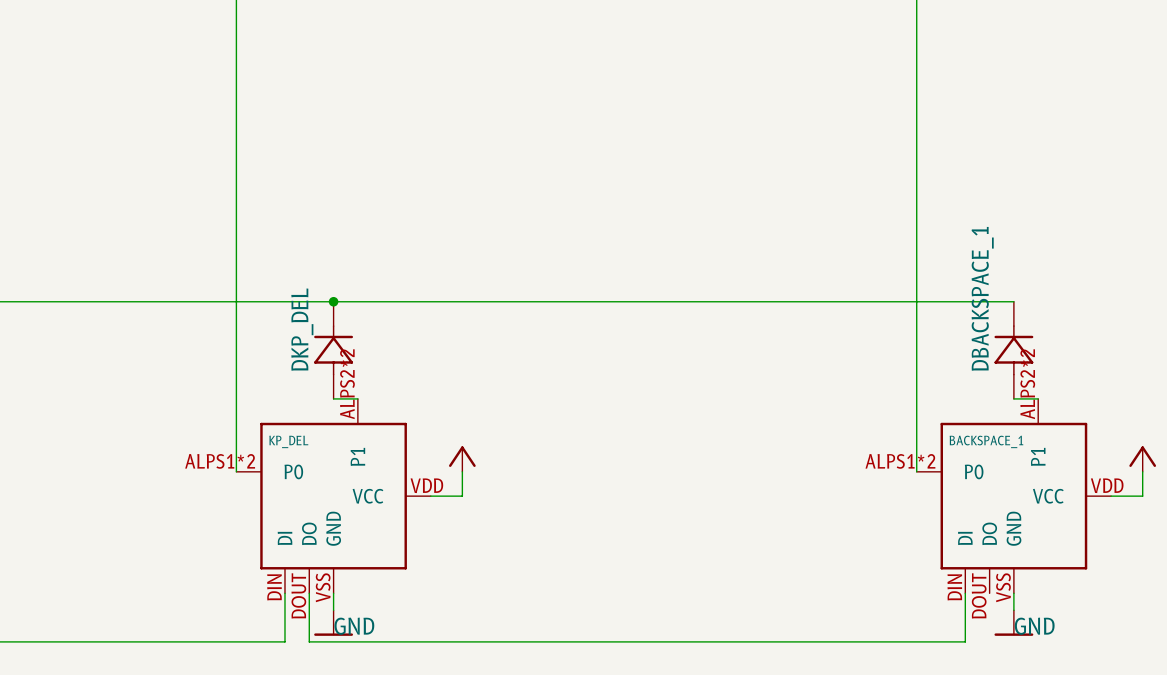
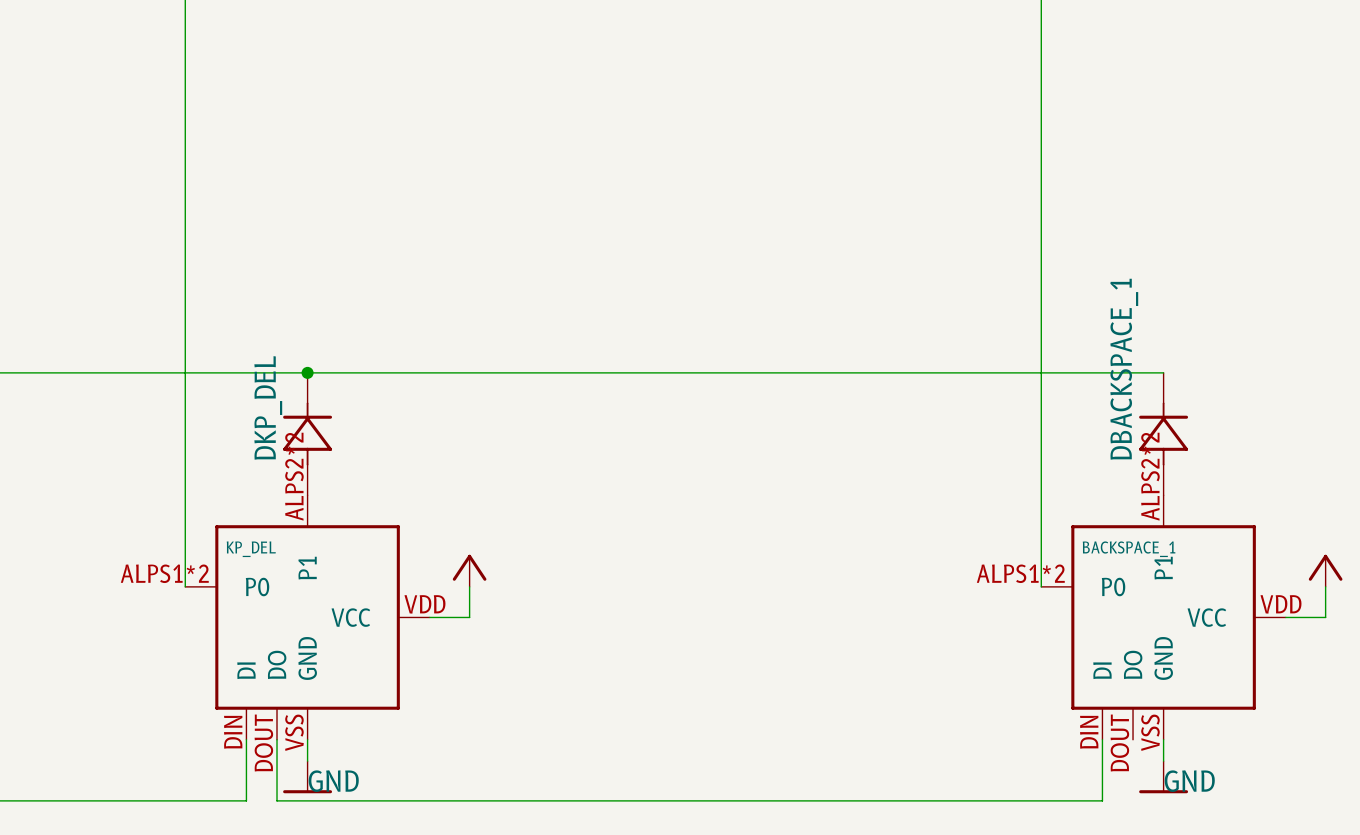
KP_DEL symbol: [236, 398, 431, 594] -> [185, 495, 430, 740]
wire: (333, 398) (357, 398) -> none
BACKSPACE_1 symbol: [916, 398, 1112, 594] -> [1041, 495, 1286, 740]
wire: (1013, 398) (1038, 398) -> none

